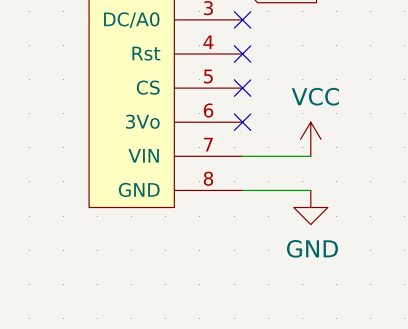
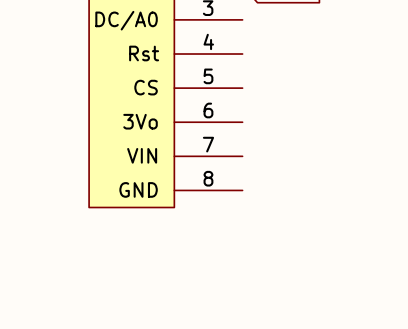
no-connect mark: (242, 19) -> none
no-connect mark: (242, 54) -> none
no-connect mark: (242, 88) -> none
no-connect mark: (242, 122) -> none
power symbol: VCC (310, 139) -> none
wire: (242, 156) (310, 156) -> none
wire: (242, 190) (310, 190) -> none
power symbol: GND (310, 207) -> none

